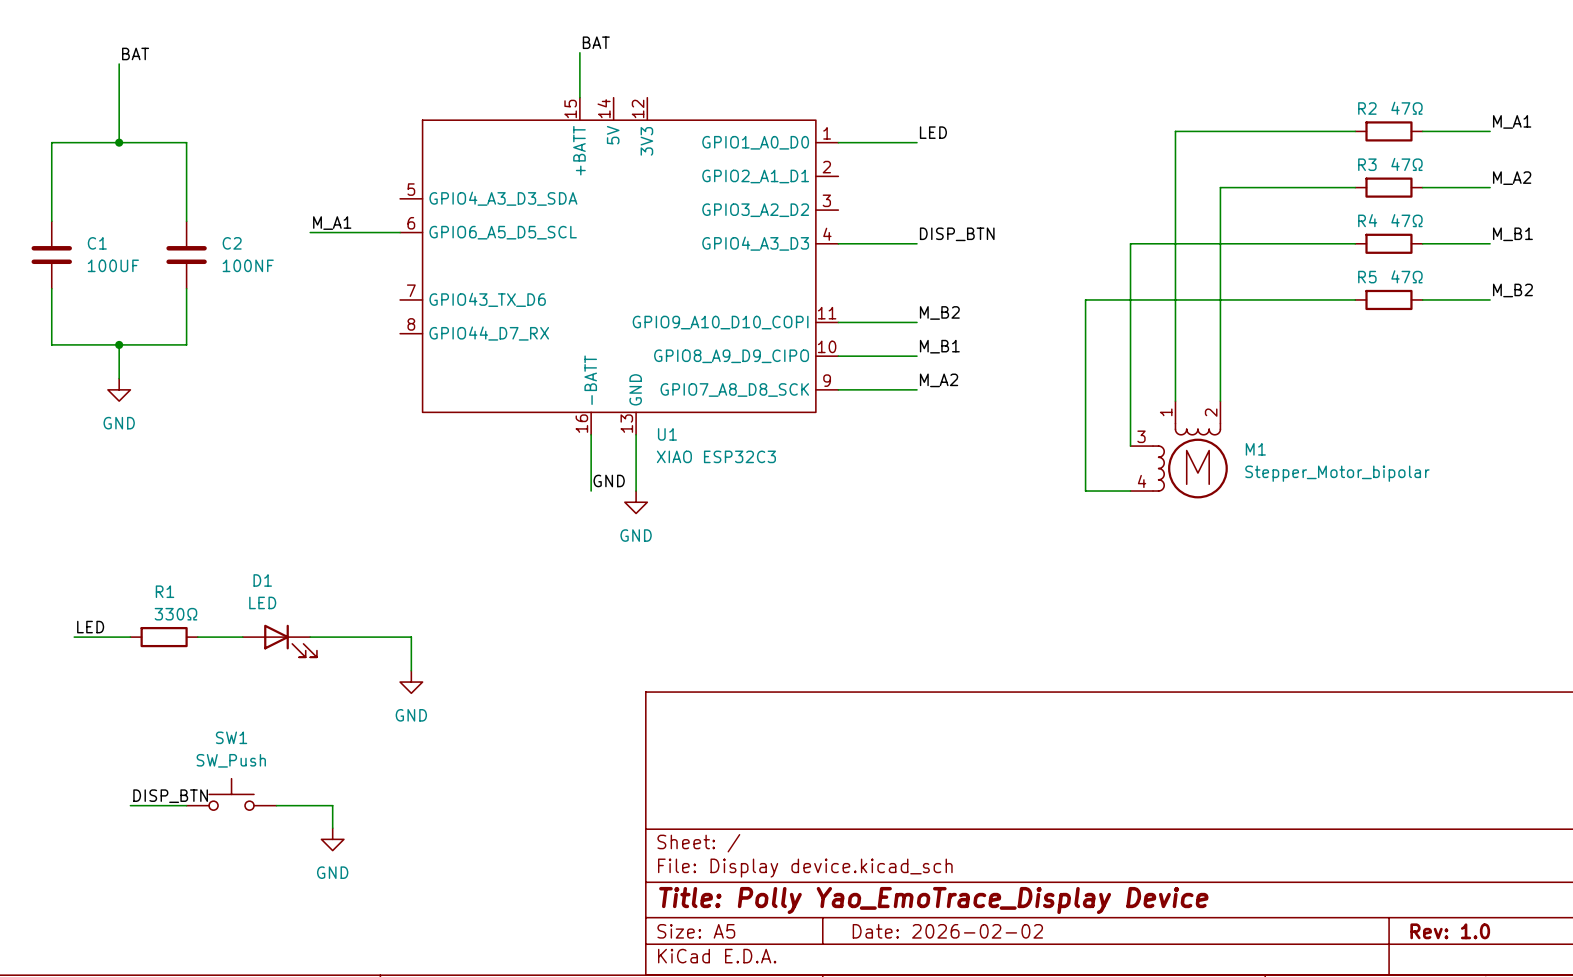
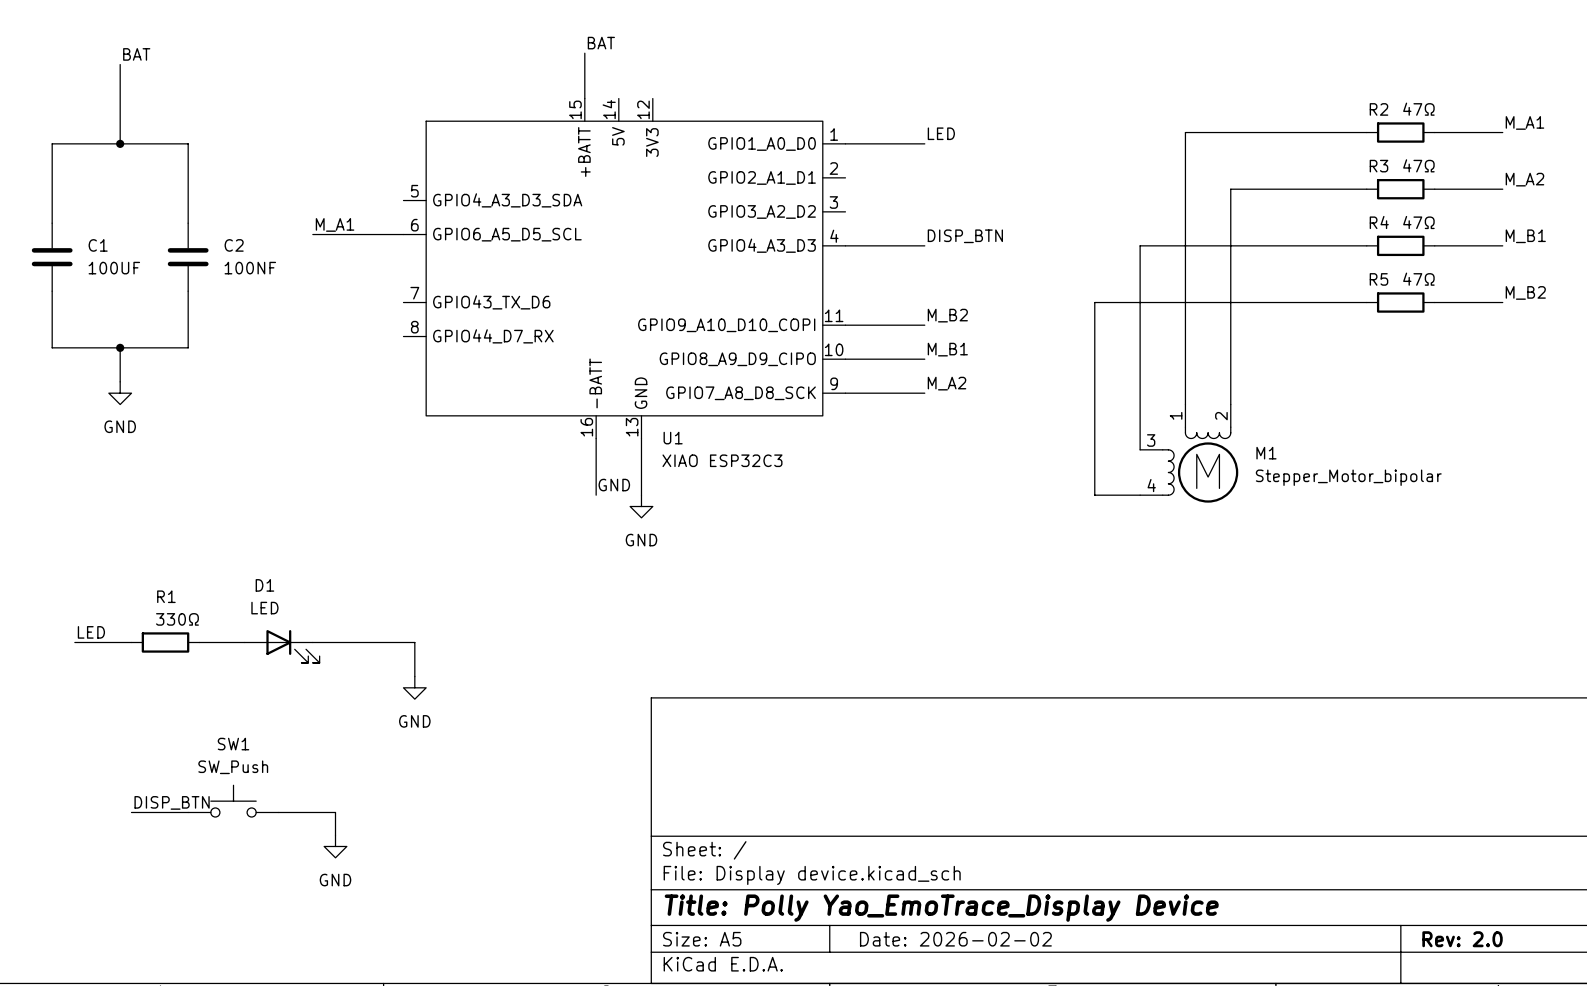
title block: Rev: 1.0 (1450, 931) -> Rev: 2.0 (1462, 939)

